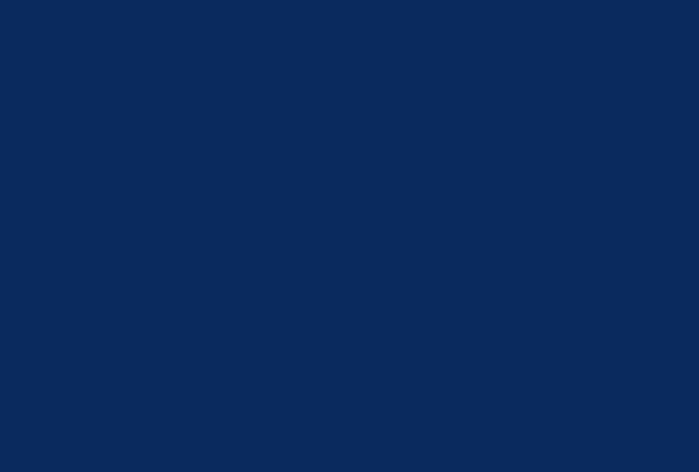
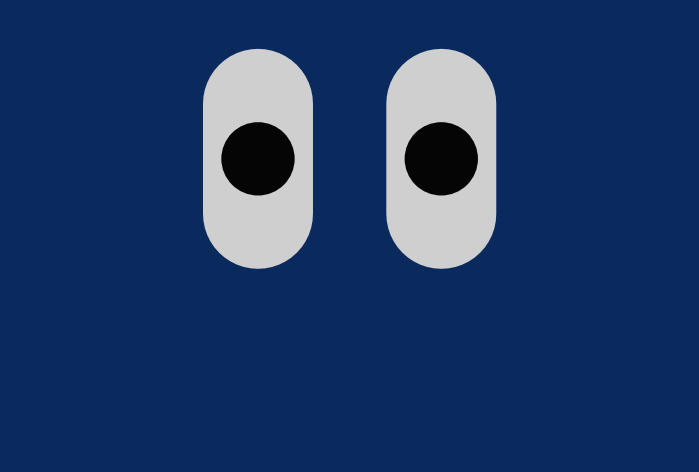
part: none -> (349, 158)

